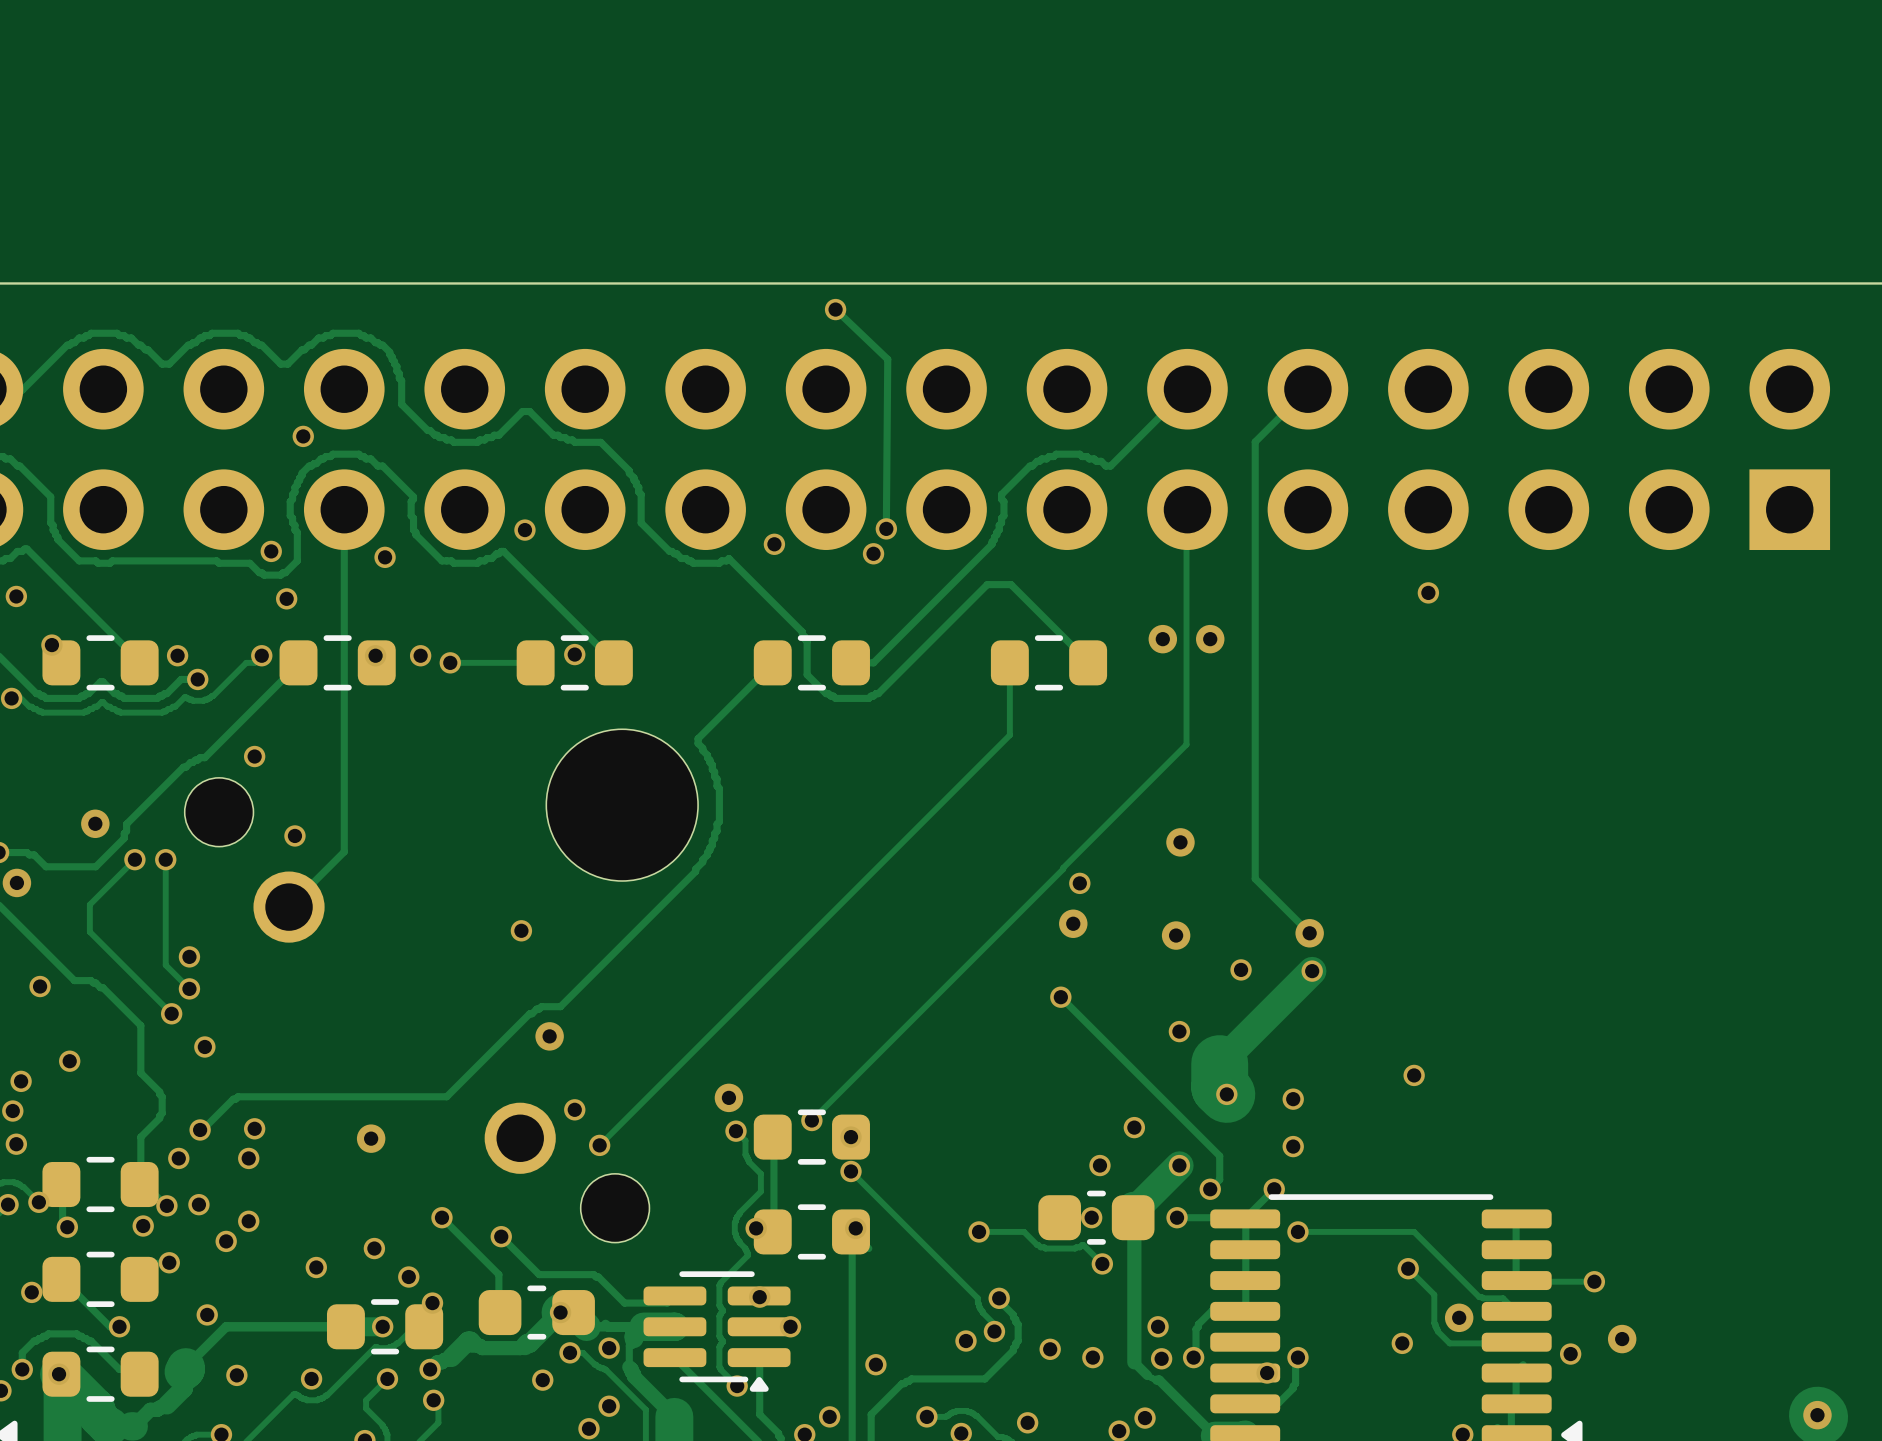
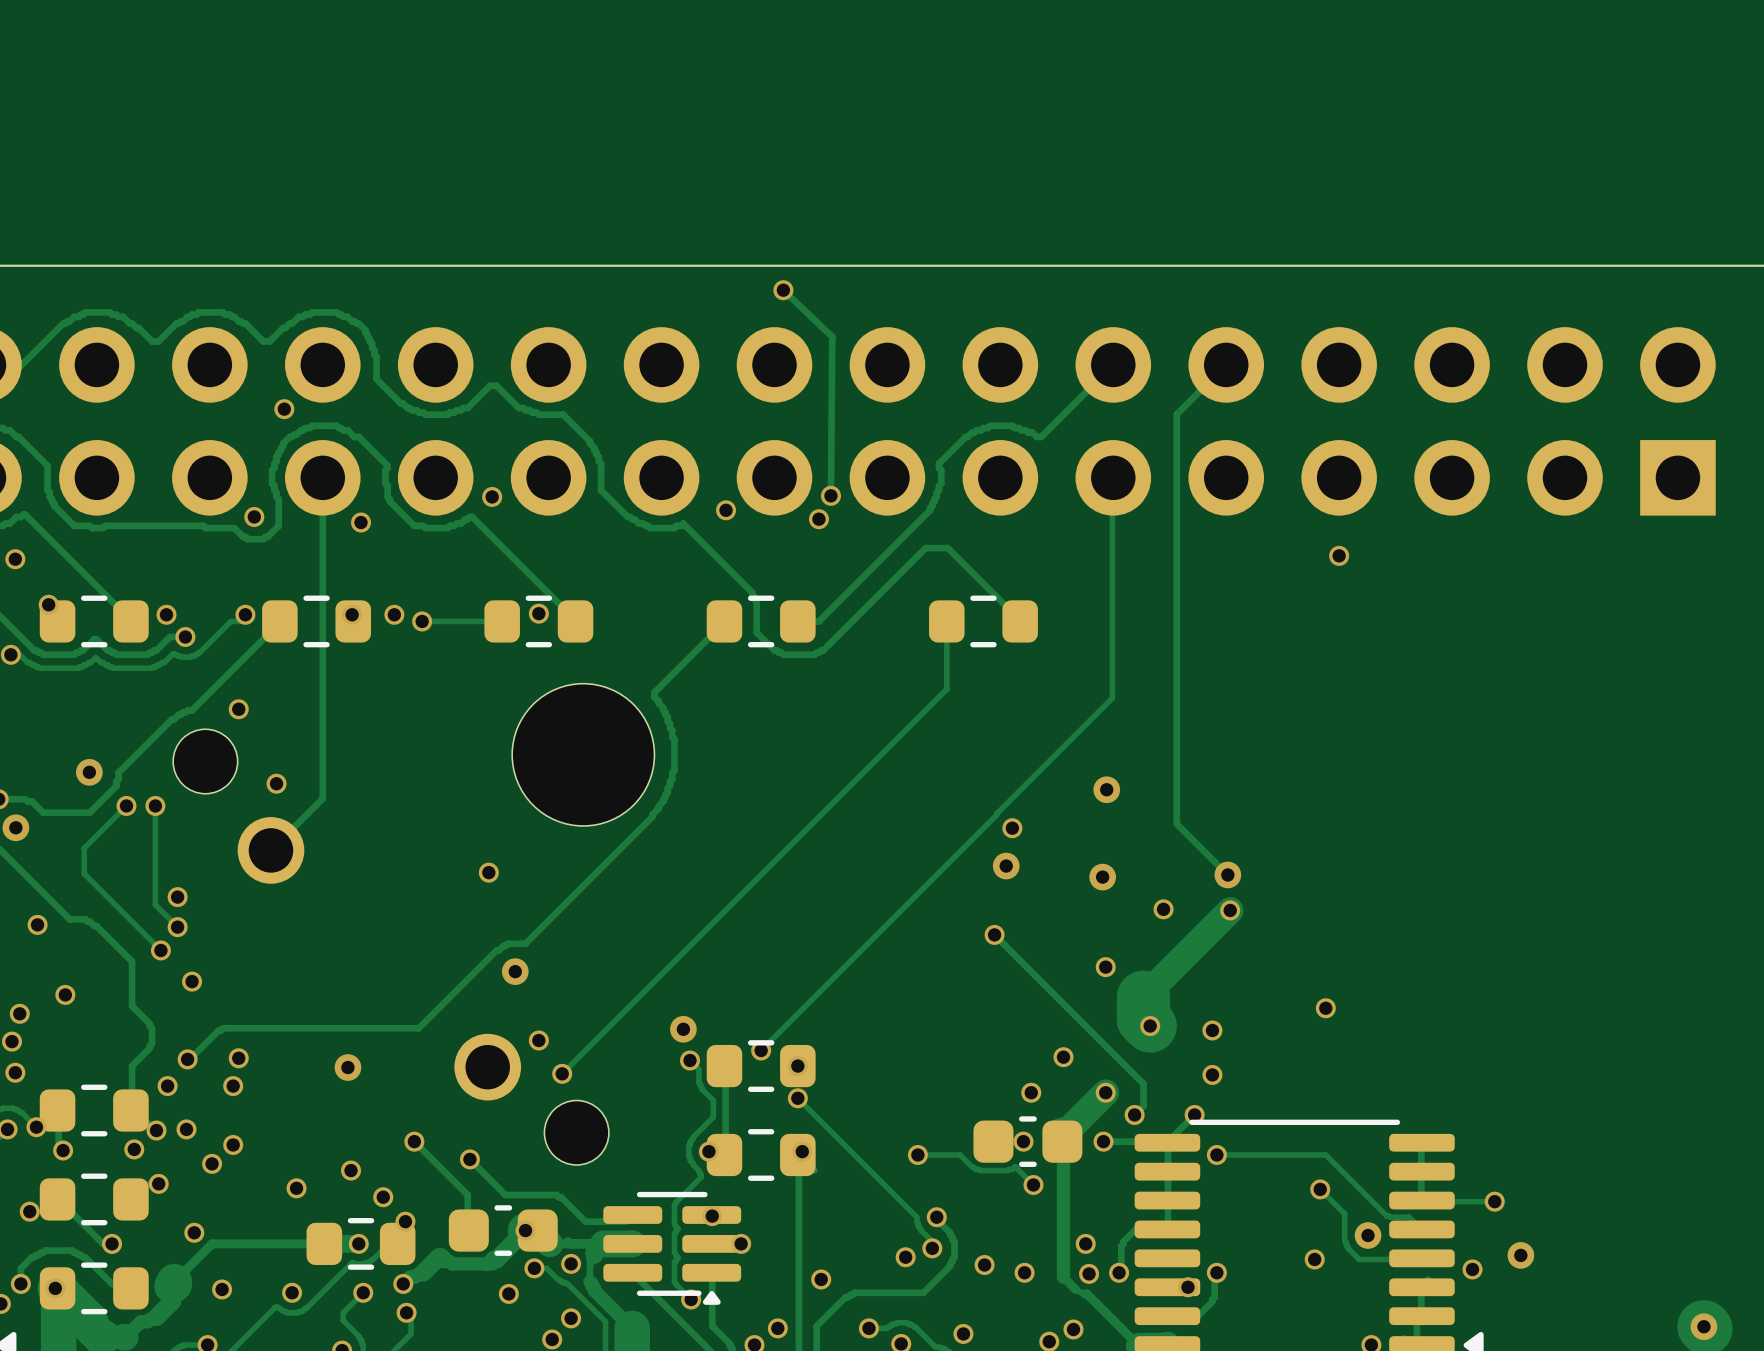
via: (286, 598) -> none
via: (1162, 639) -> none
via: (1210, 639) -> none

